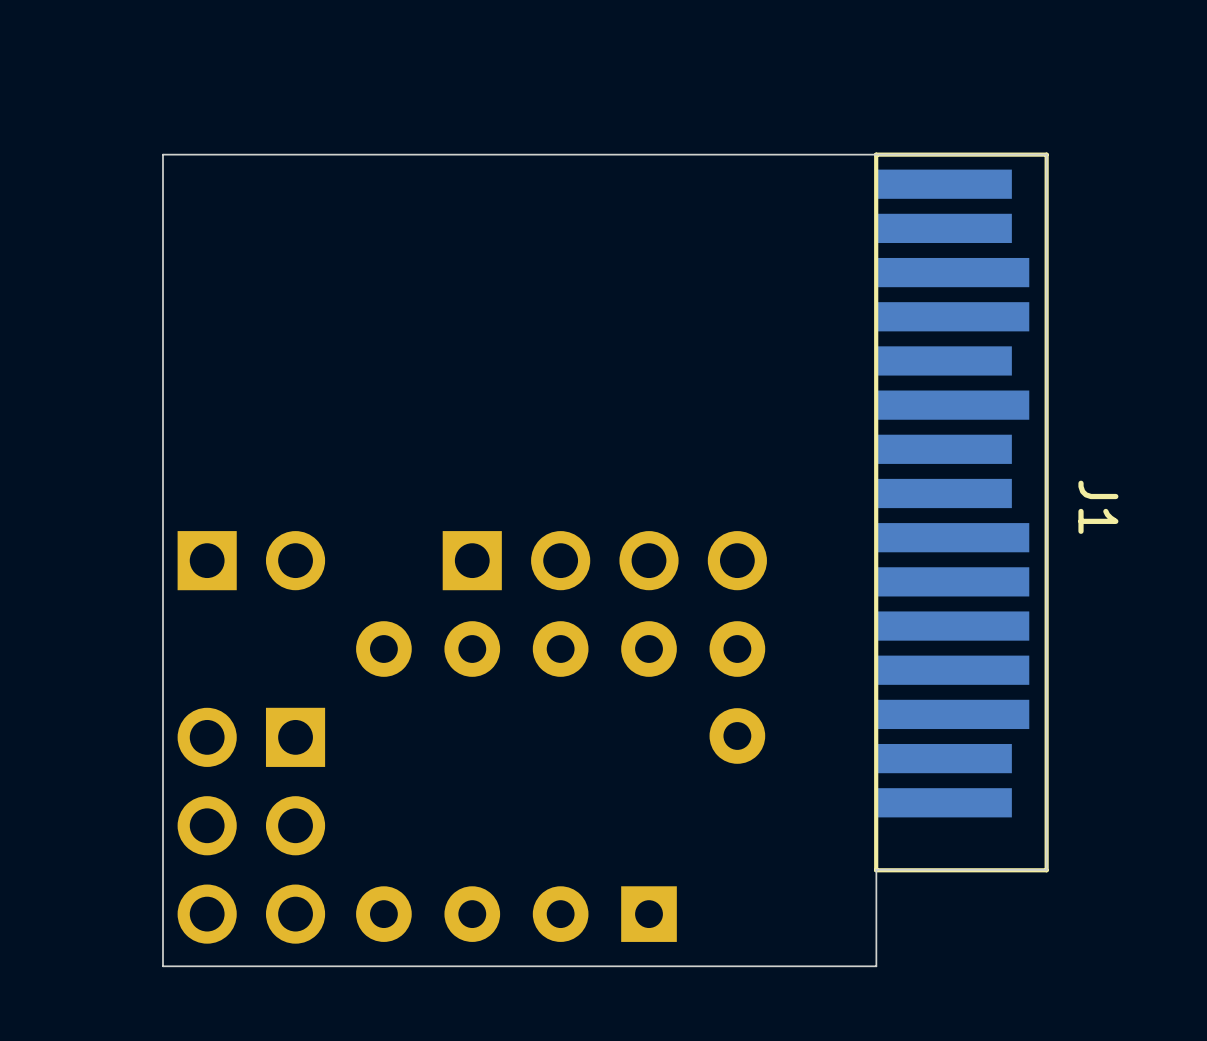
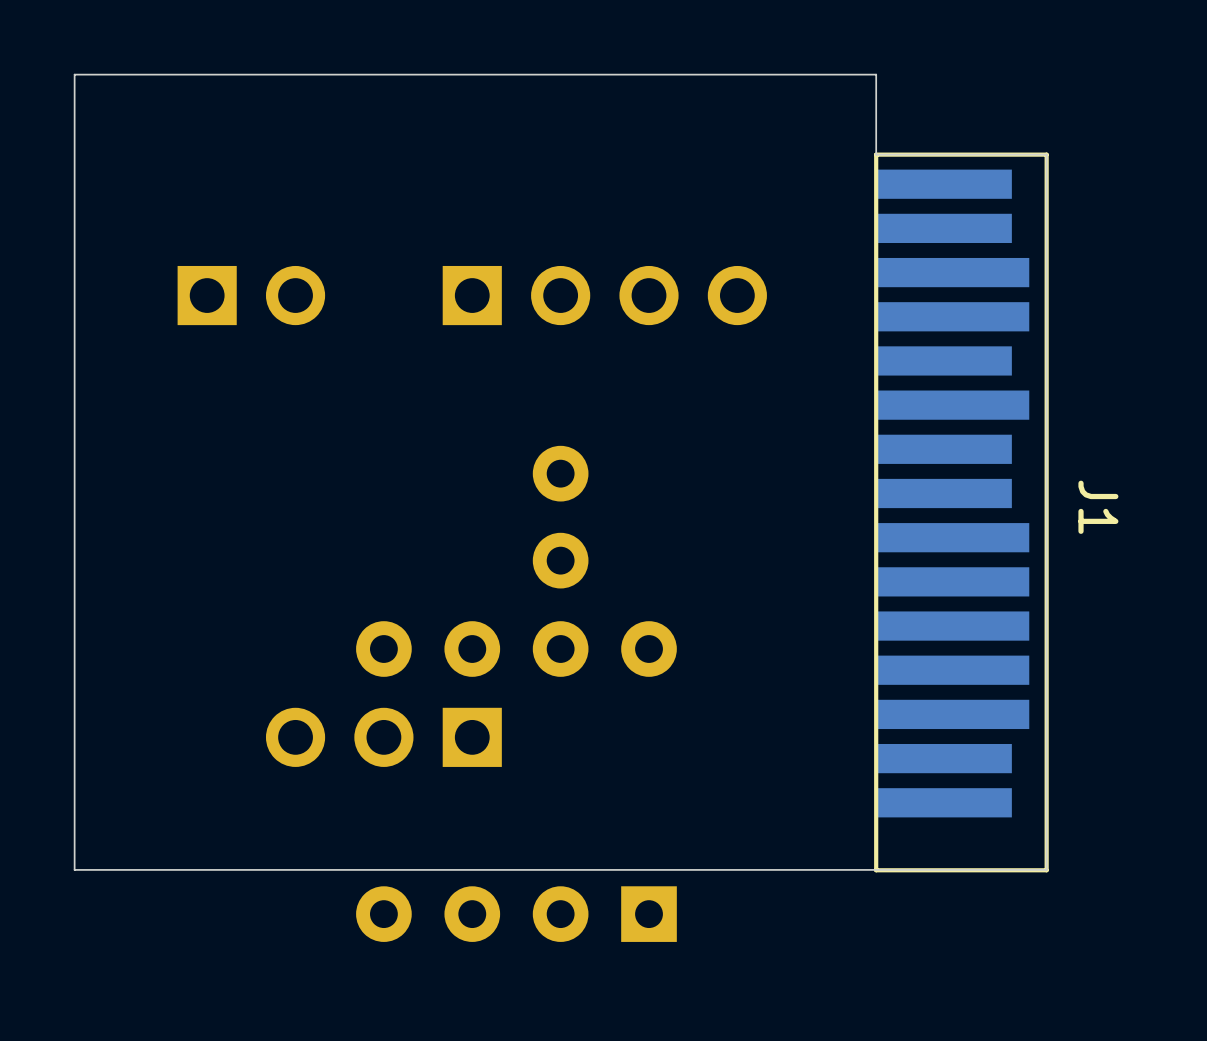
board edge: (876, 154) (162, 154) (162, 966) (876, 966) (876, 869) (1046, 869) -> (876, 154) (876, 74) (74, 74) (74, 869) (1046, 869)
part position: (251, 560) -> (251, 295)
part position: (604, 560) -> (604, 295)
part position: (737, 692) -> (560, 517)
part: none -> (383, 737)
part: (251, 825) -> none

